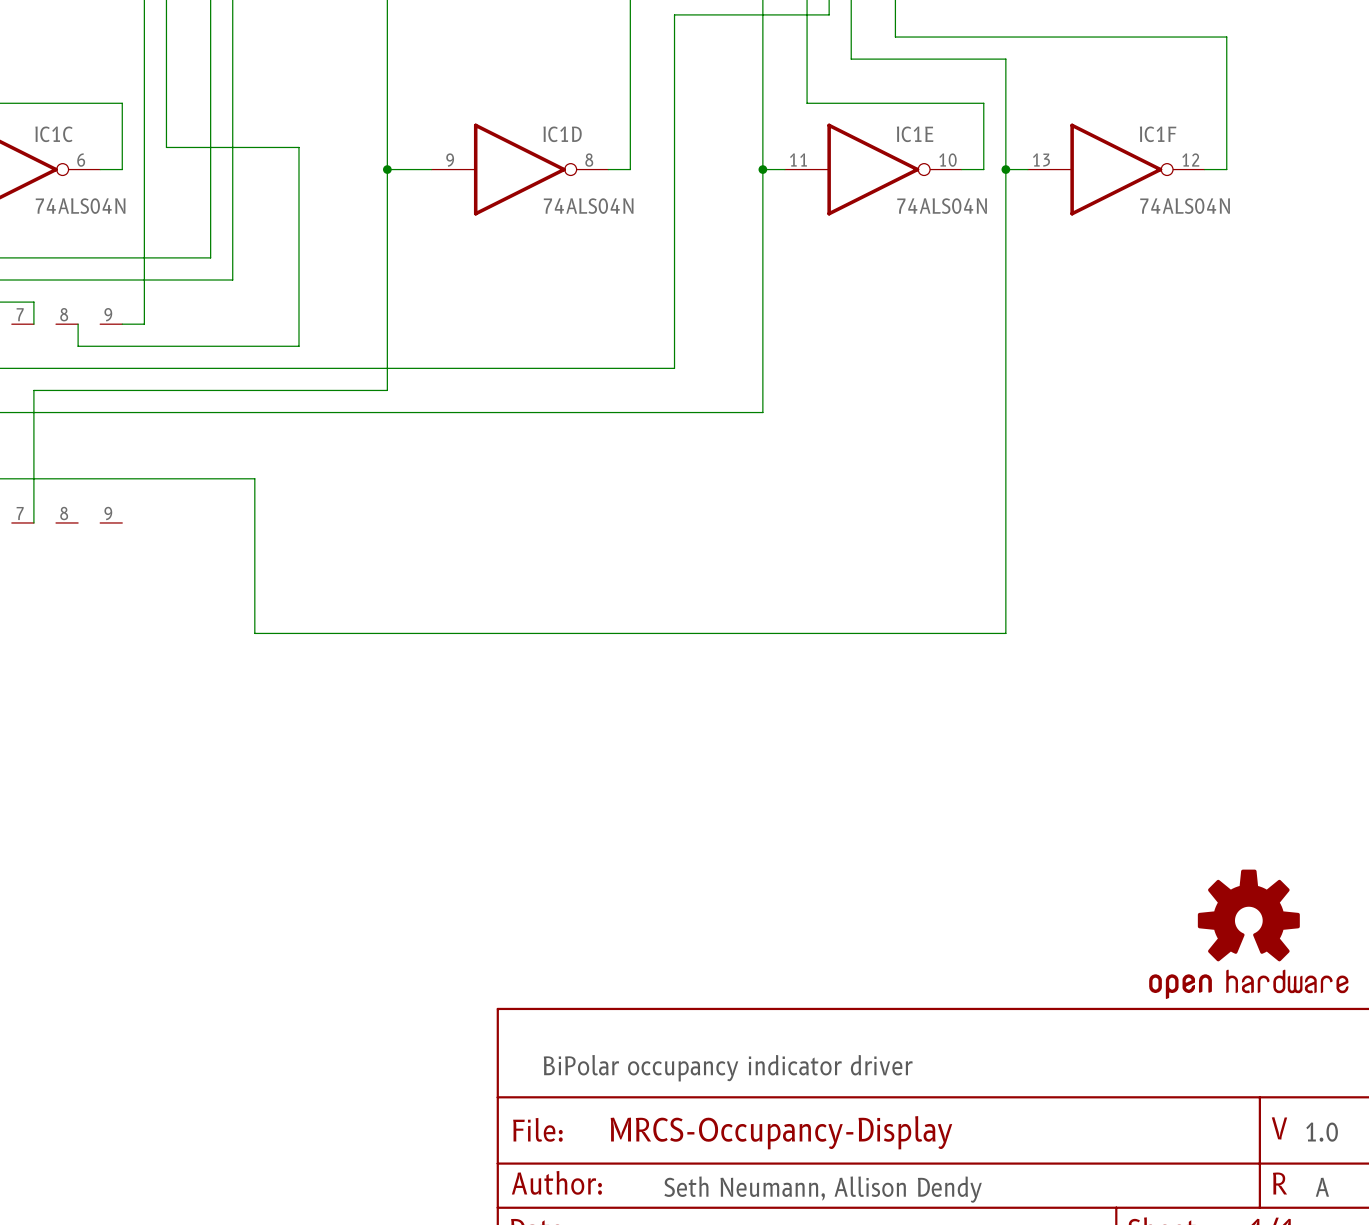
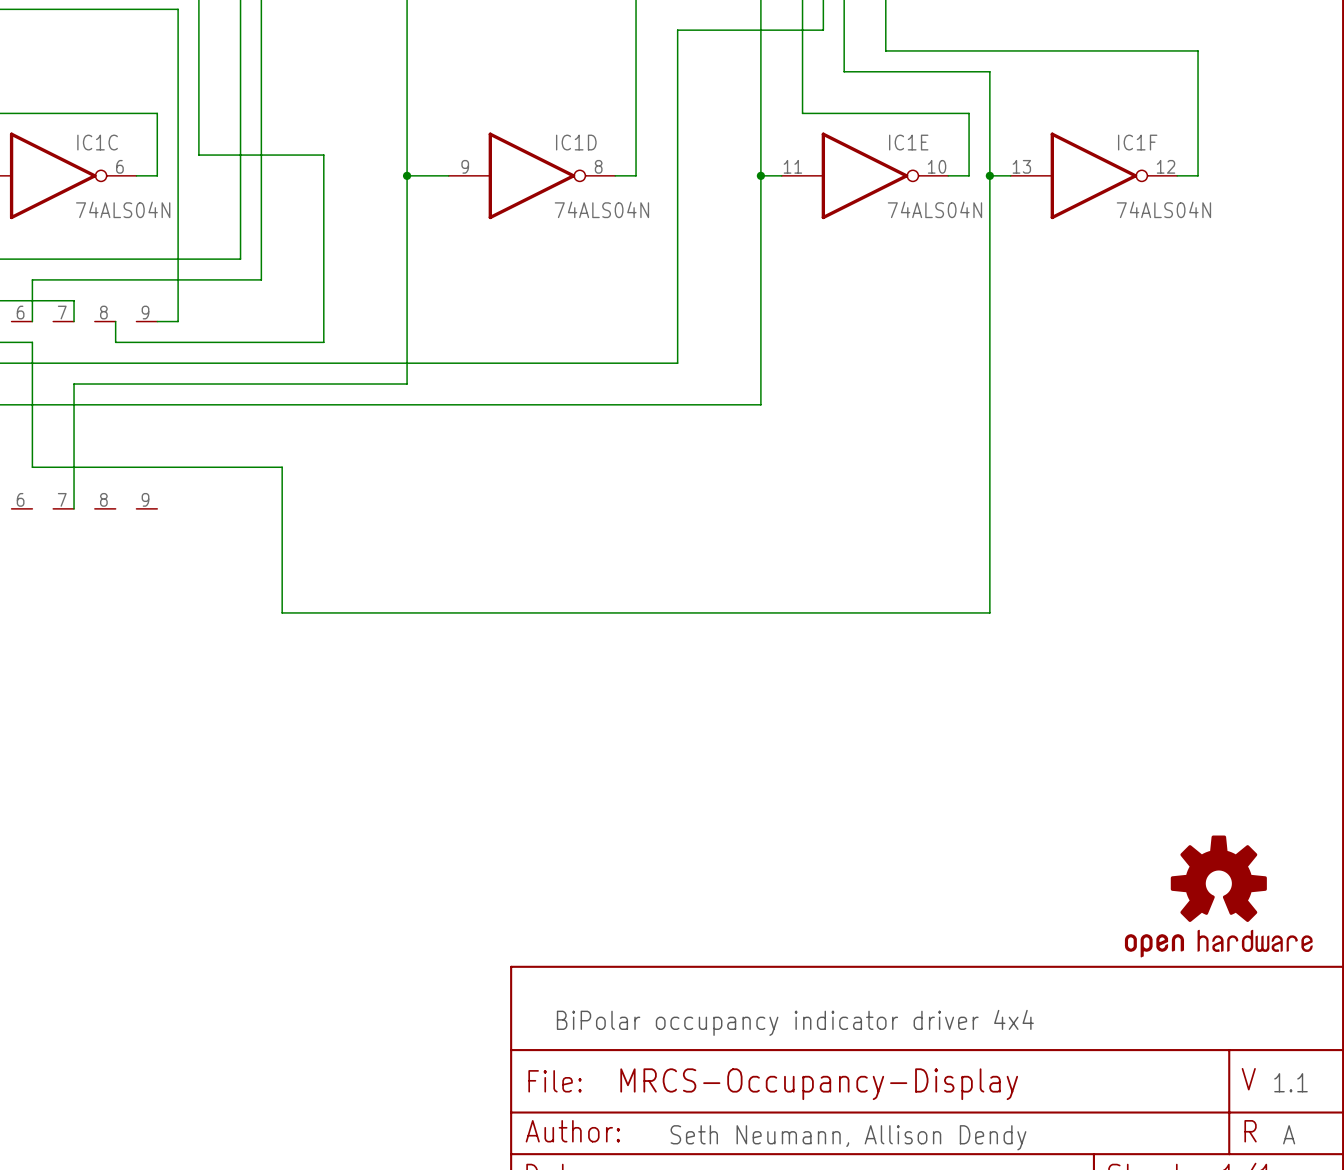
text: BiPolar occupancy indicator driver (728, 1068) -> BiPolar occupancy indicator driver 4x4 (795, 1022)
text: 1.0 (1322, 1132) -> 1.1 (1290, 1082)

